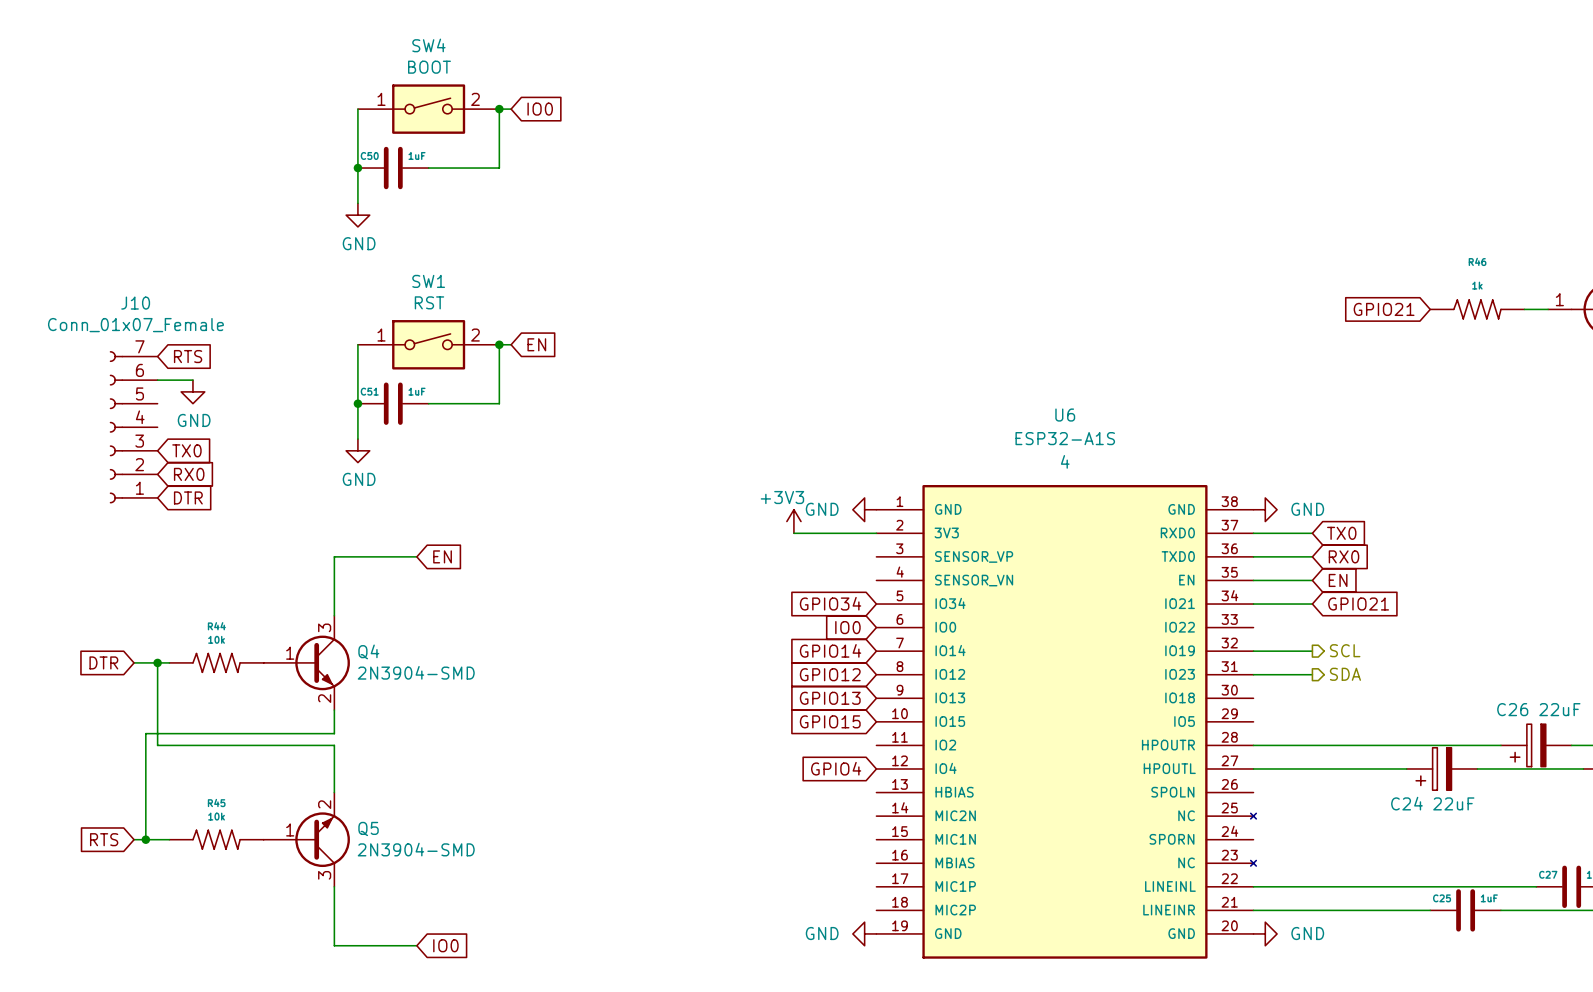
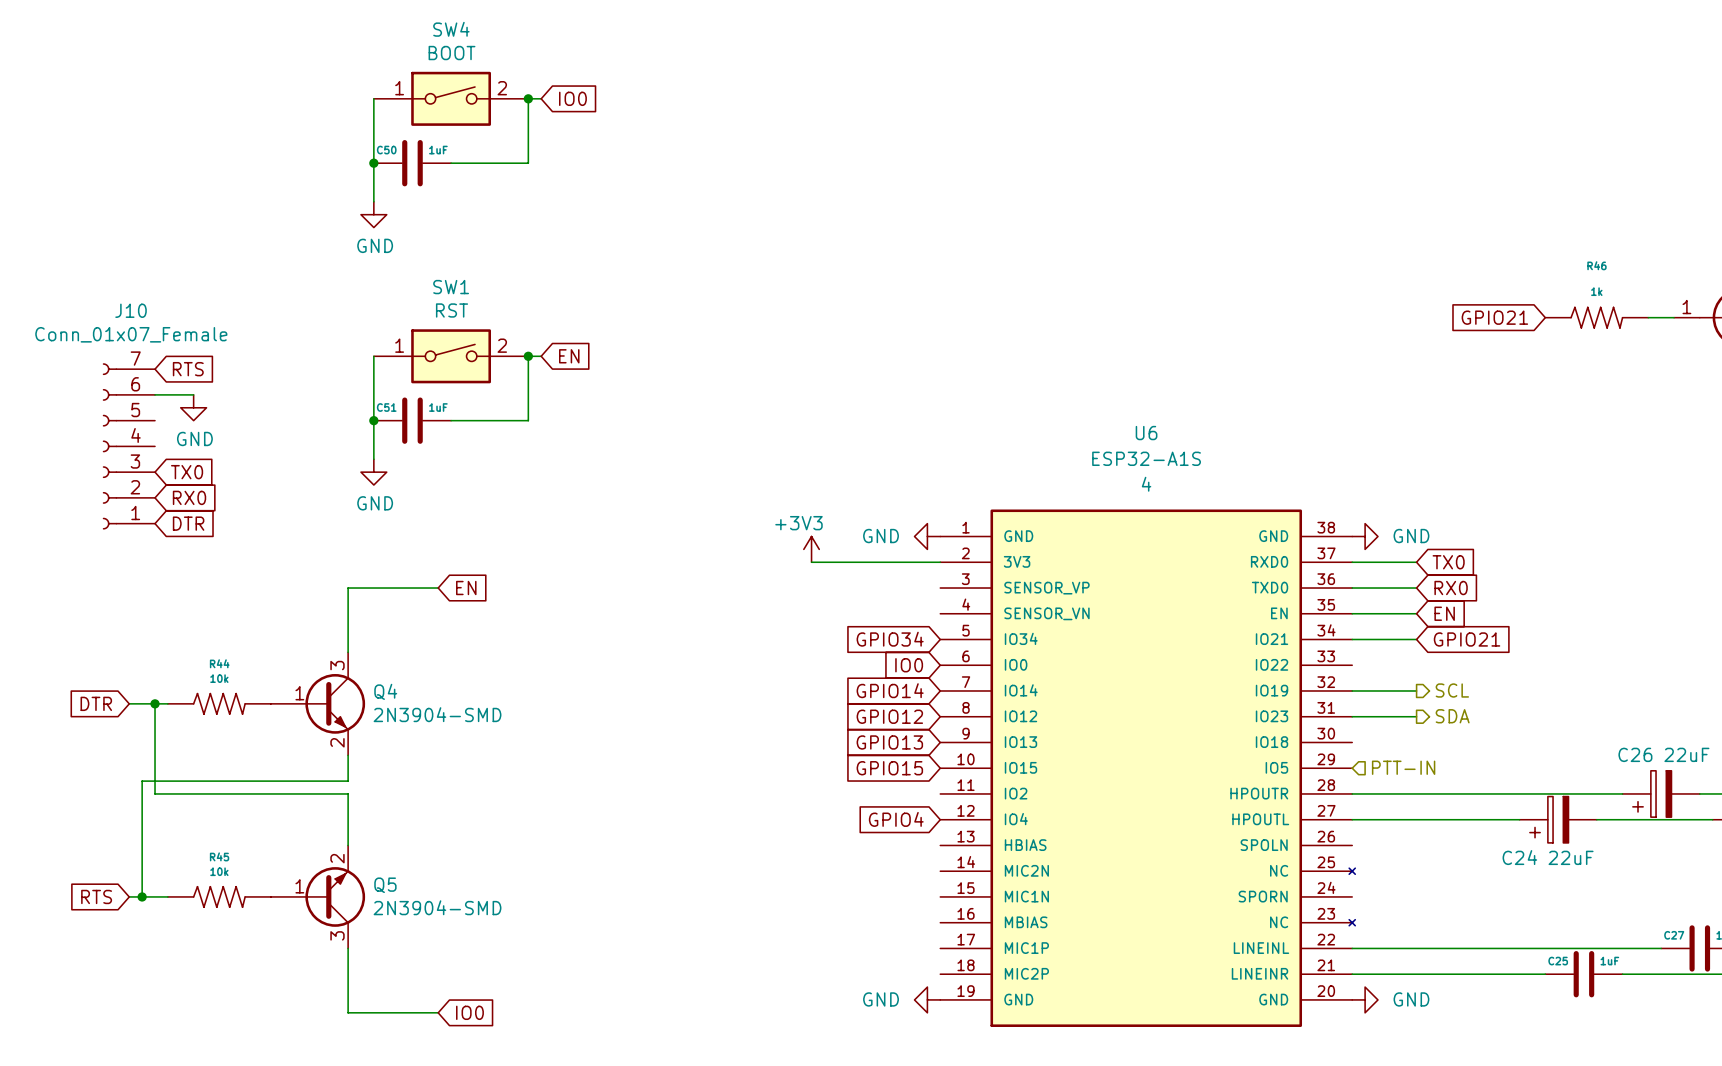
power symbol position: +3V3 (793, 521) -> +3V3 (811, 549)
wire: none -> (811, 562) (850, 562)
hierarchical label: none -> PTT-IN (1403, 767)

